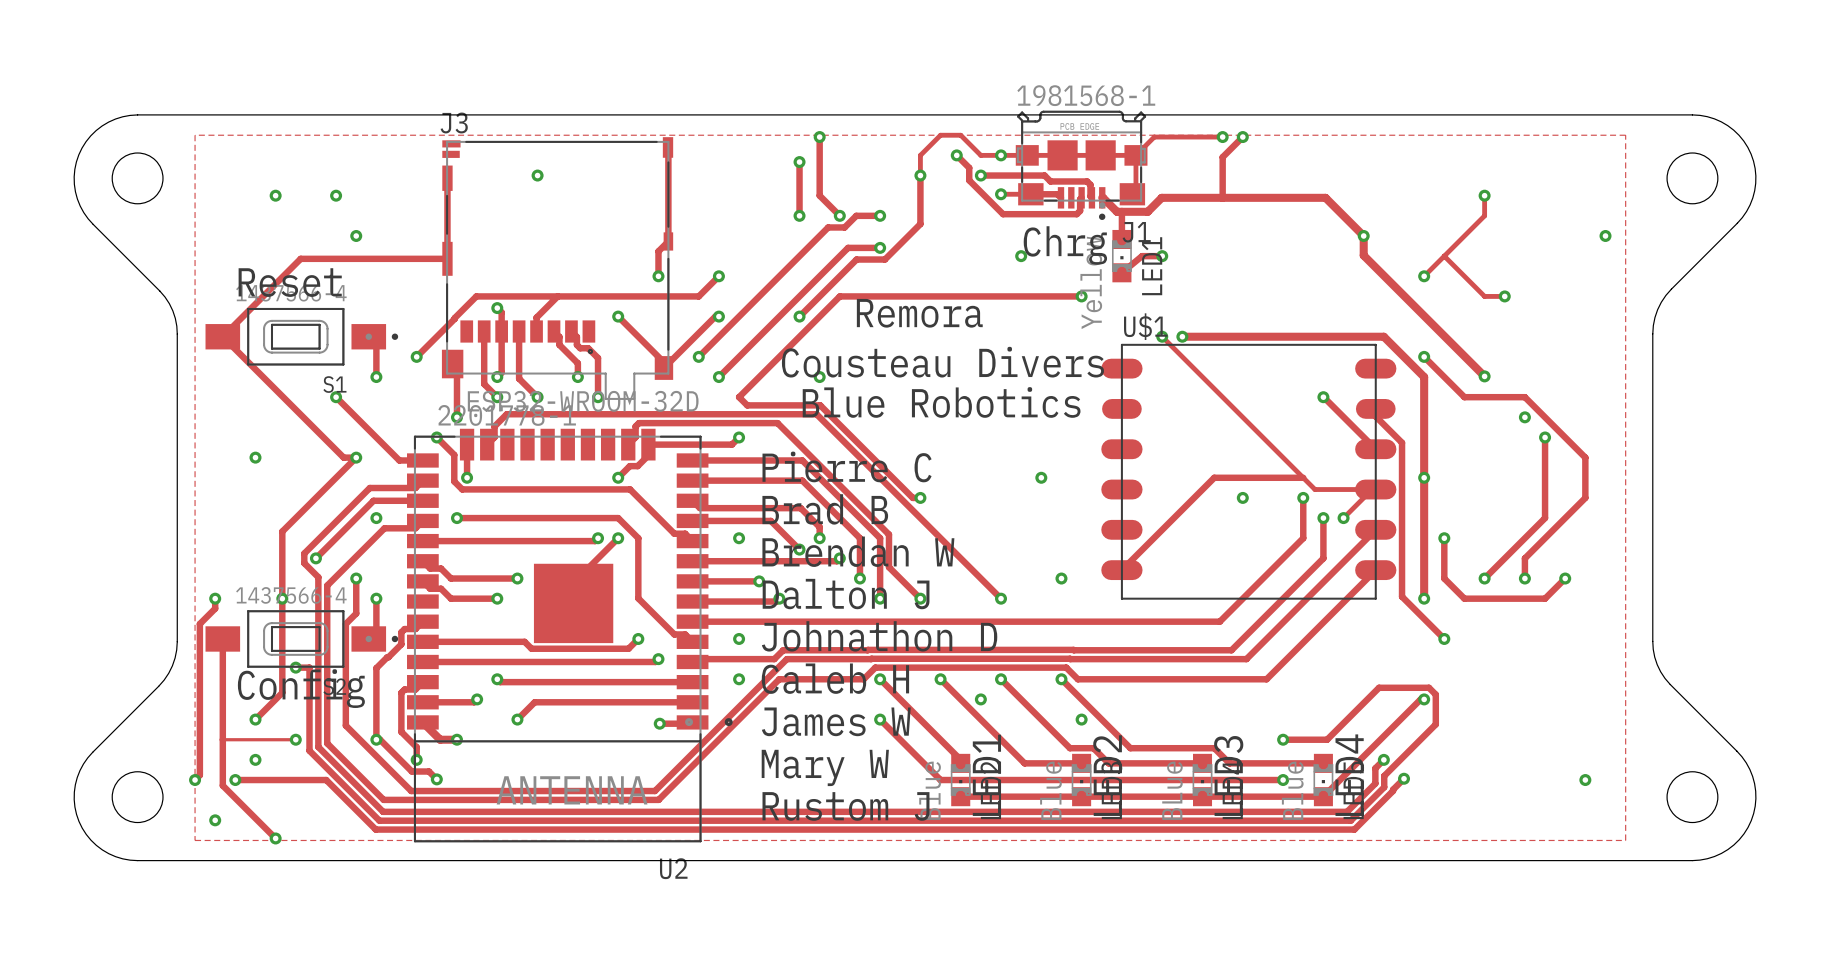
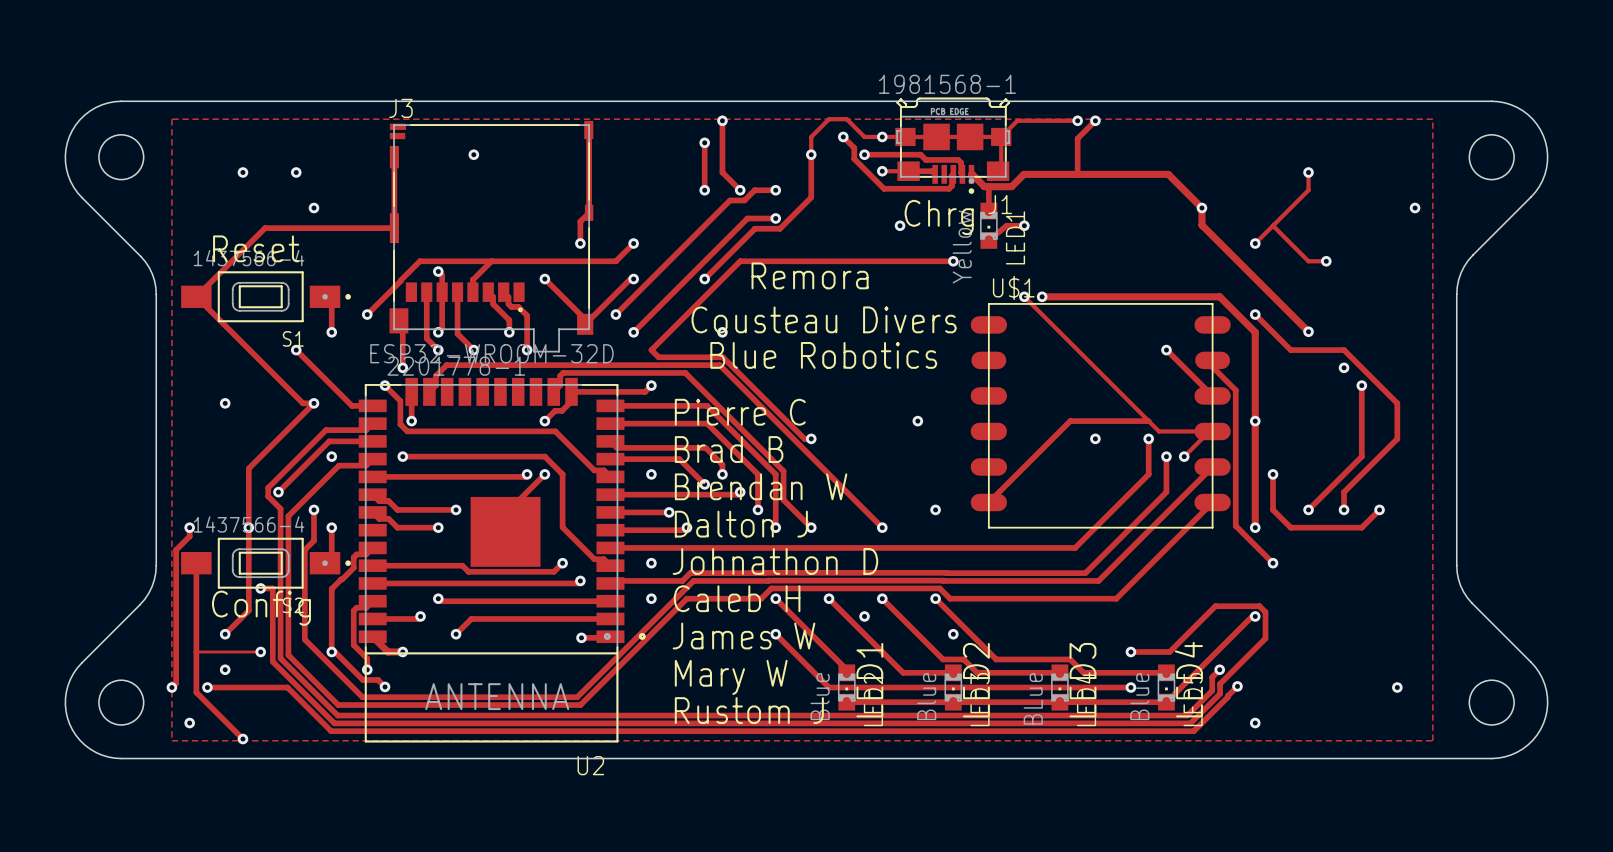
via: none -> (1255, 723)

